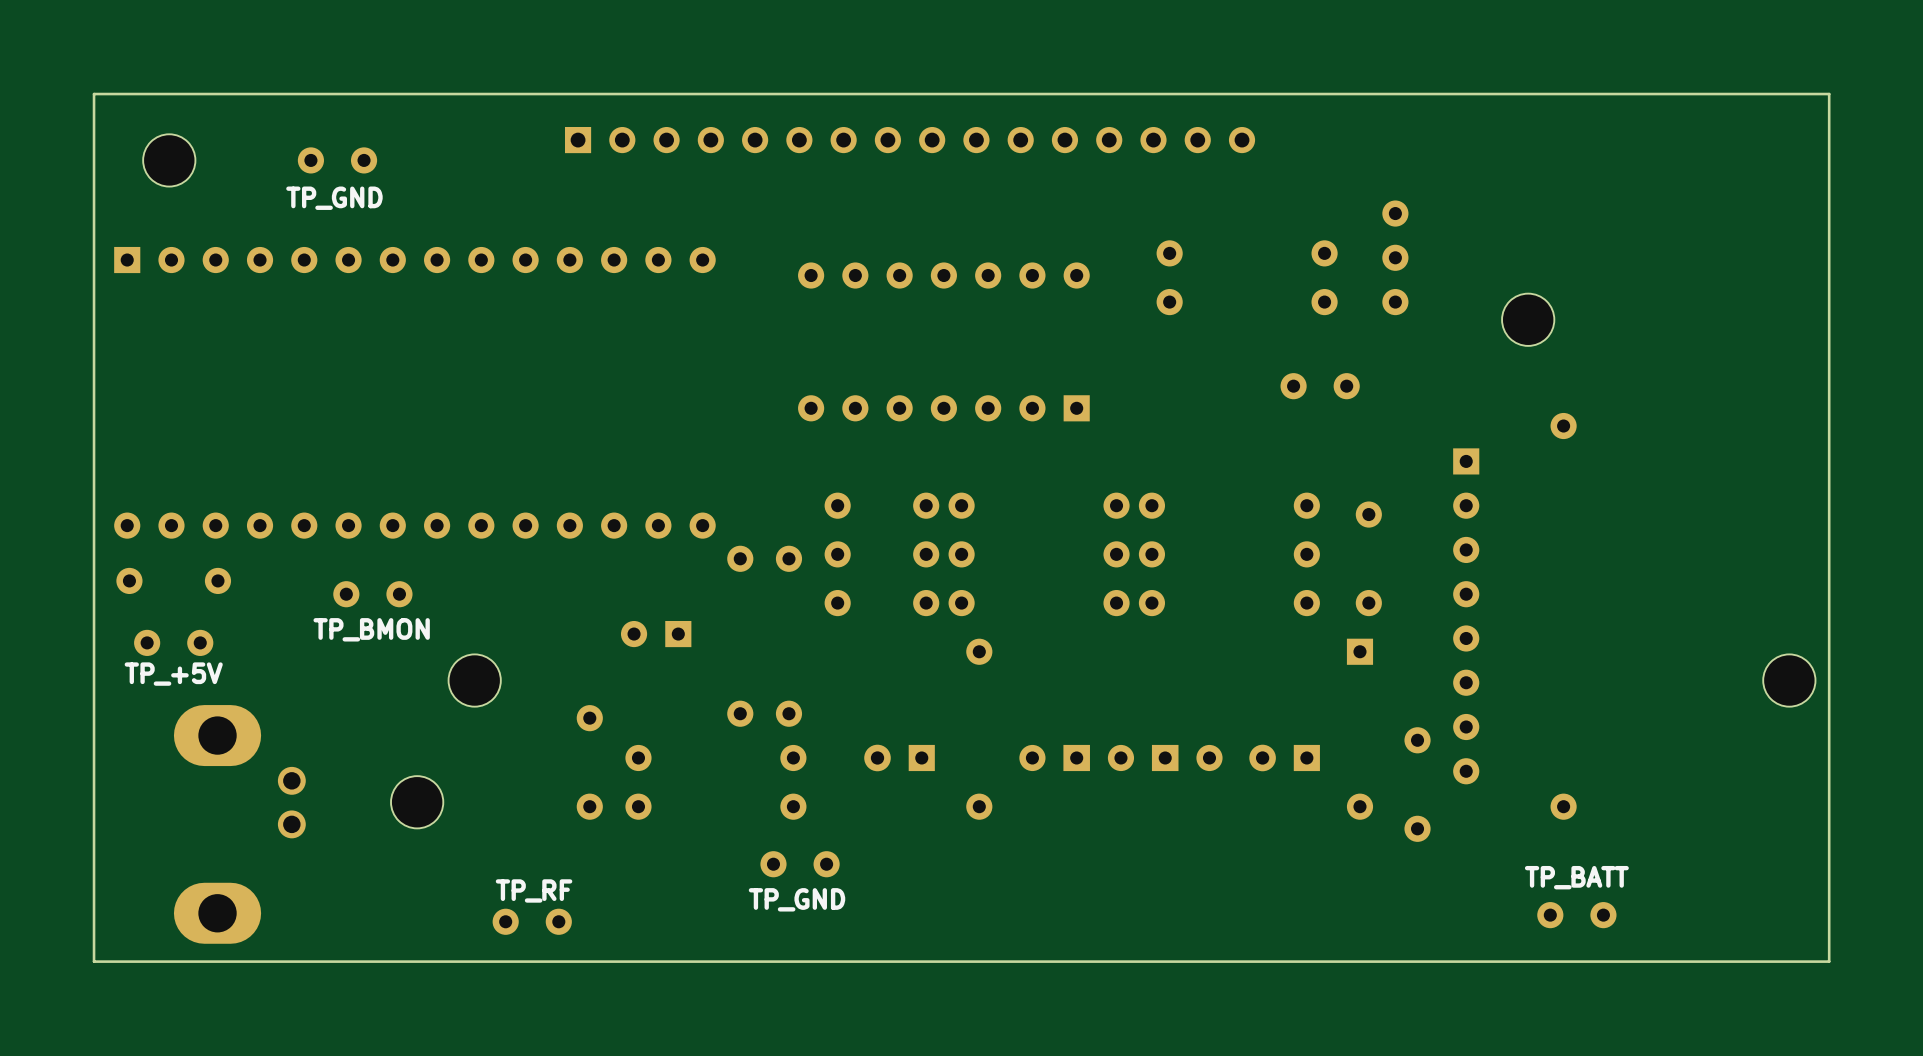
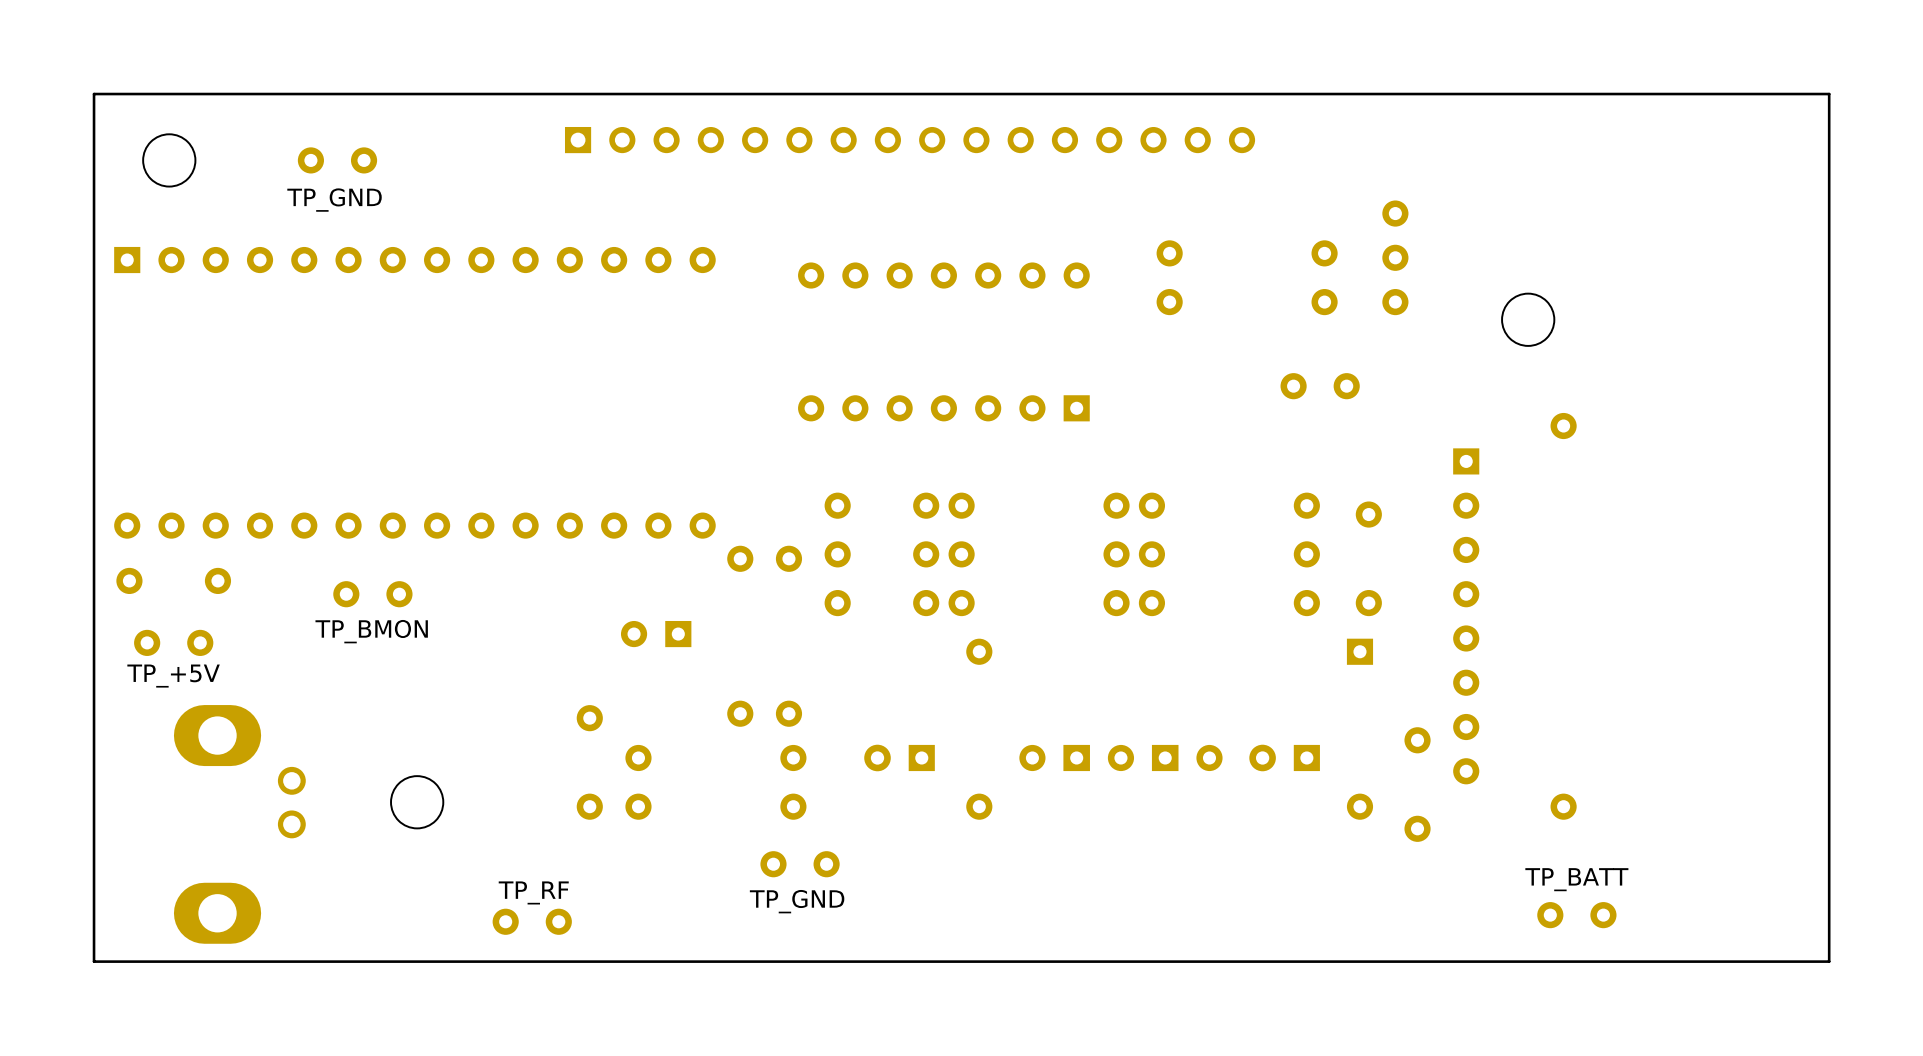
part: (474, 680) -> none
part: (1789, 680) -> none

